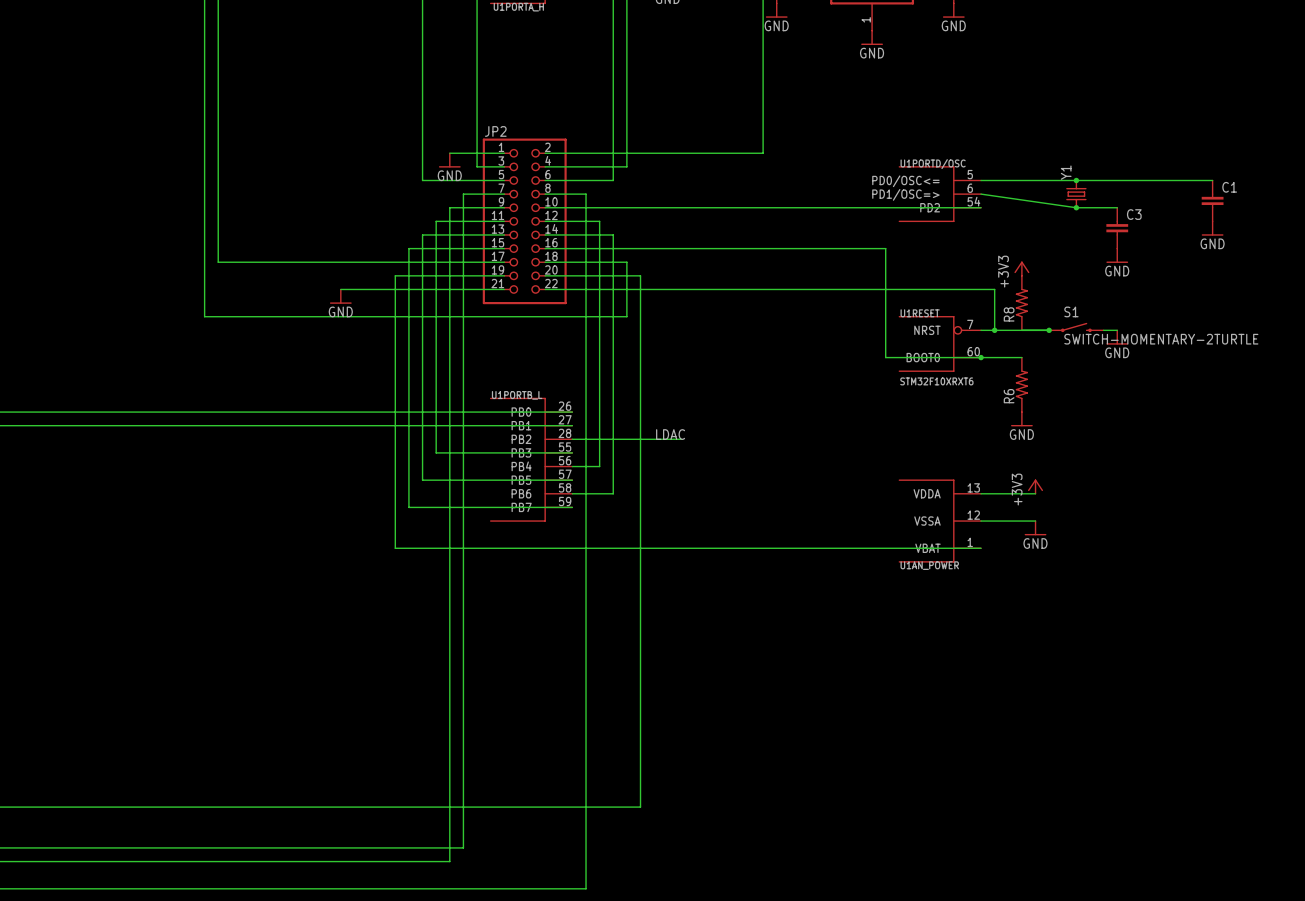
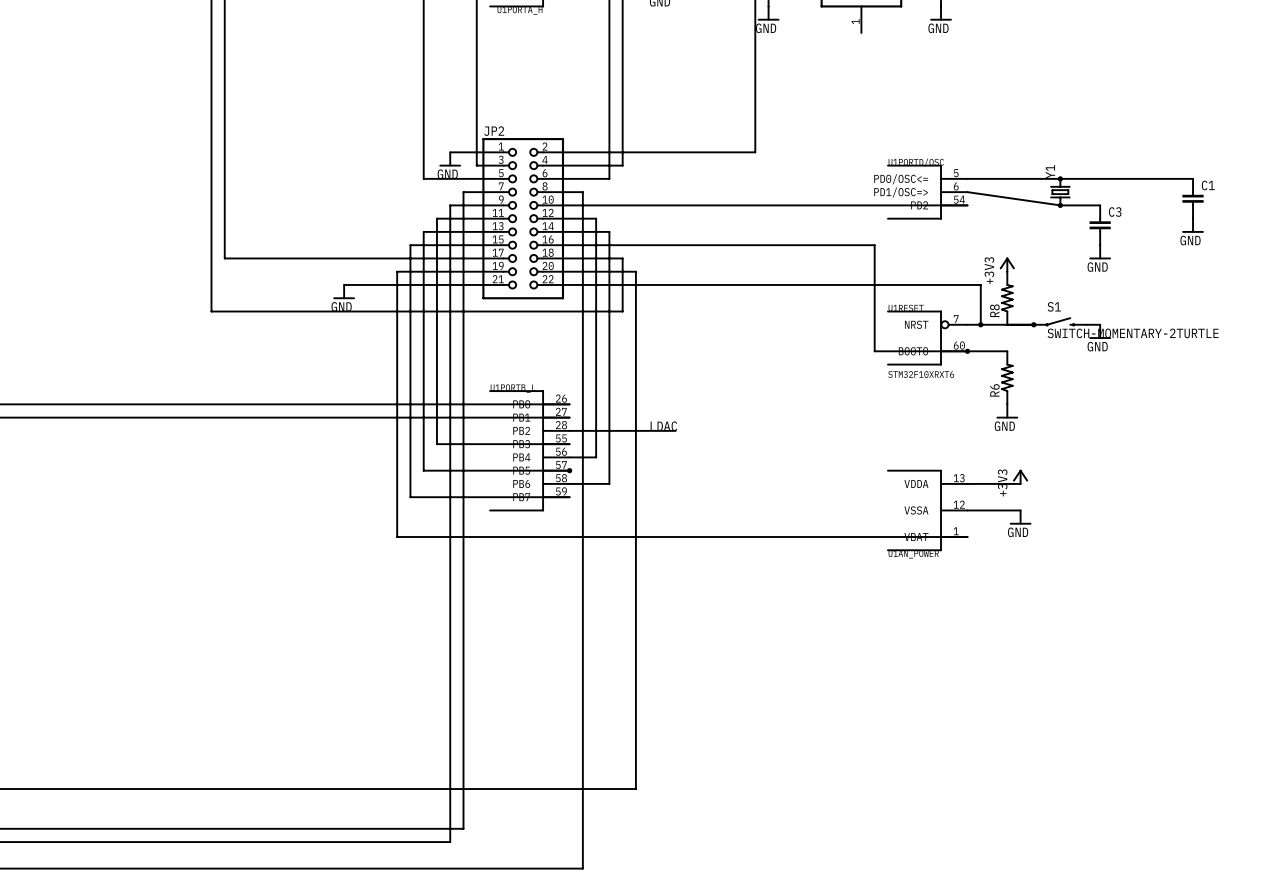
power symbol: GND (872, 37) -> none
junction: none -> (569, 470)

